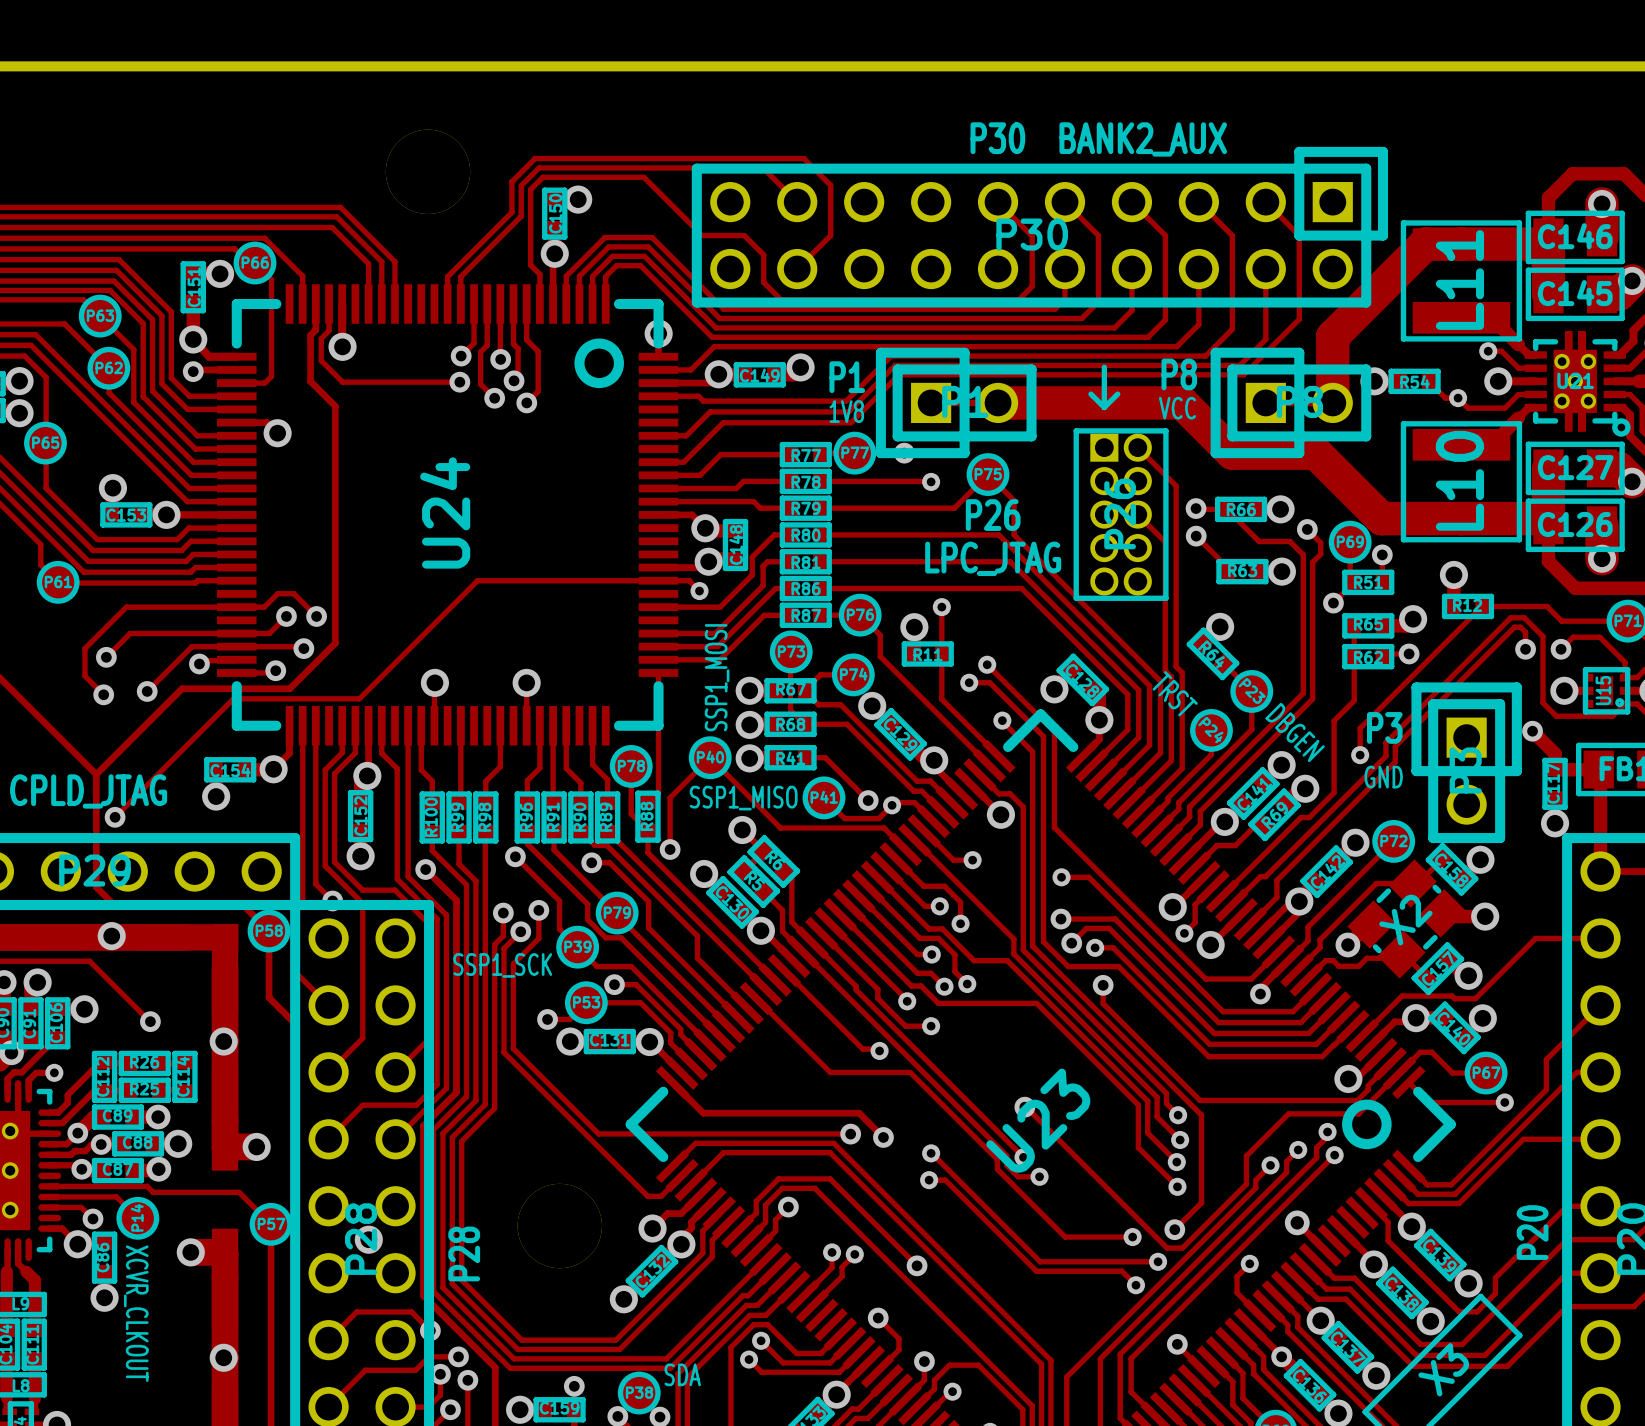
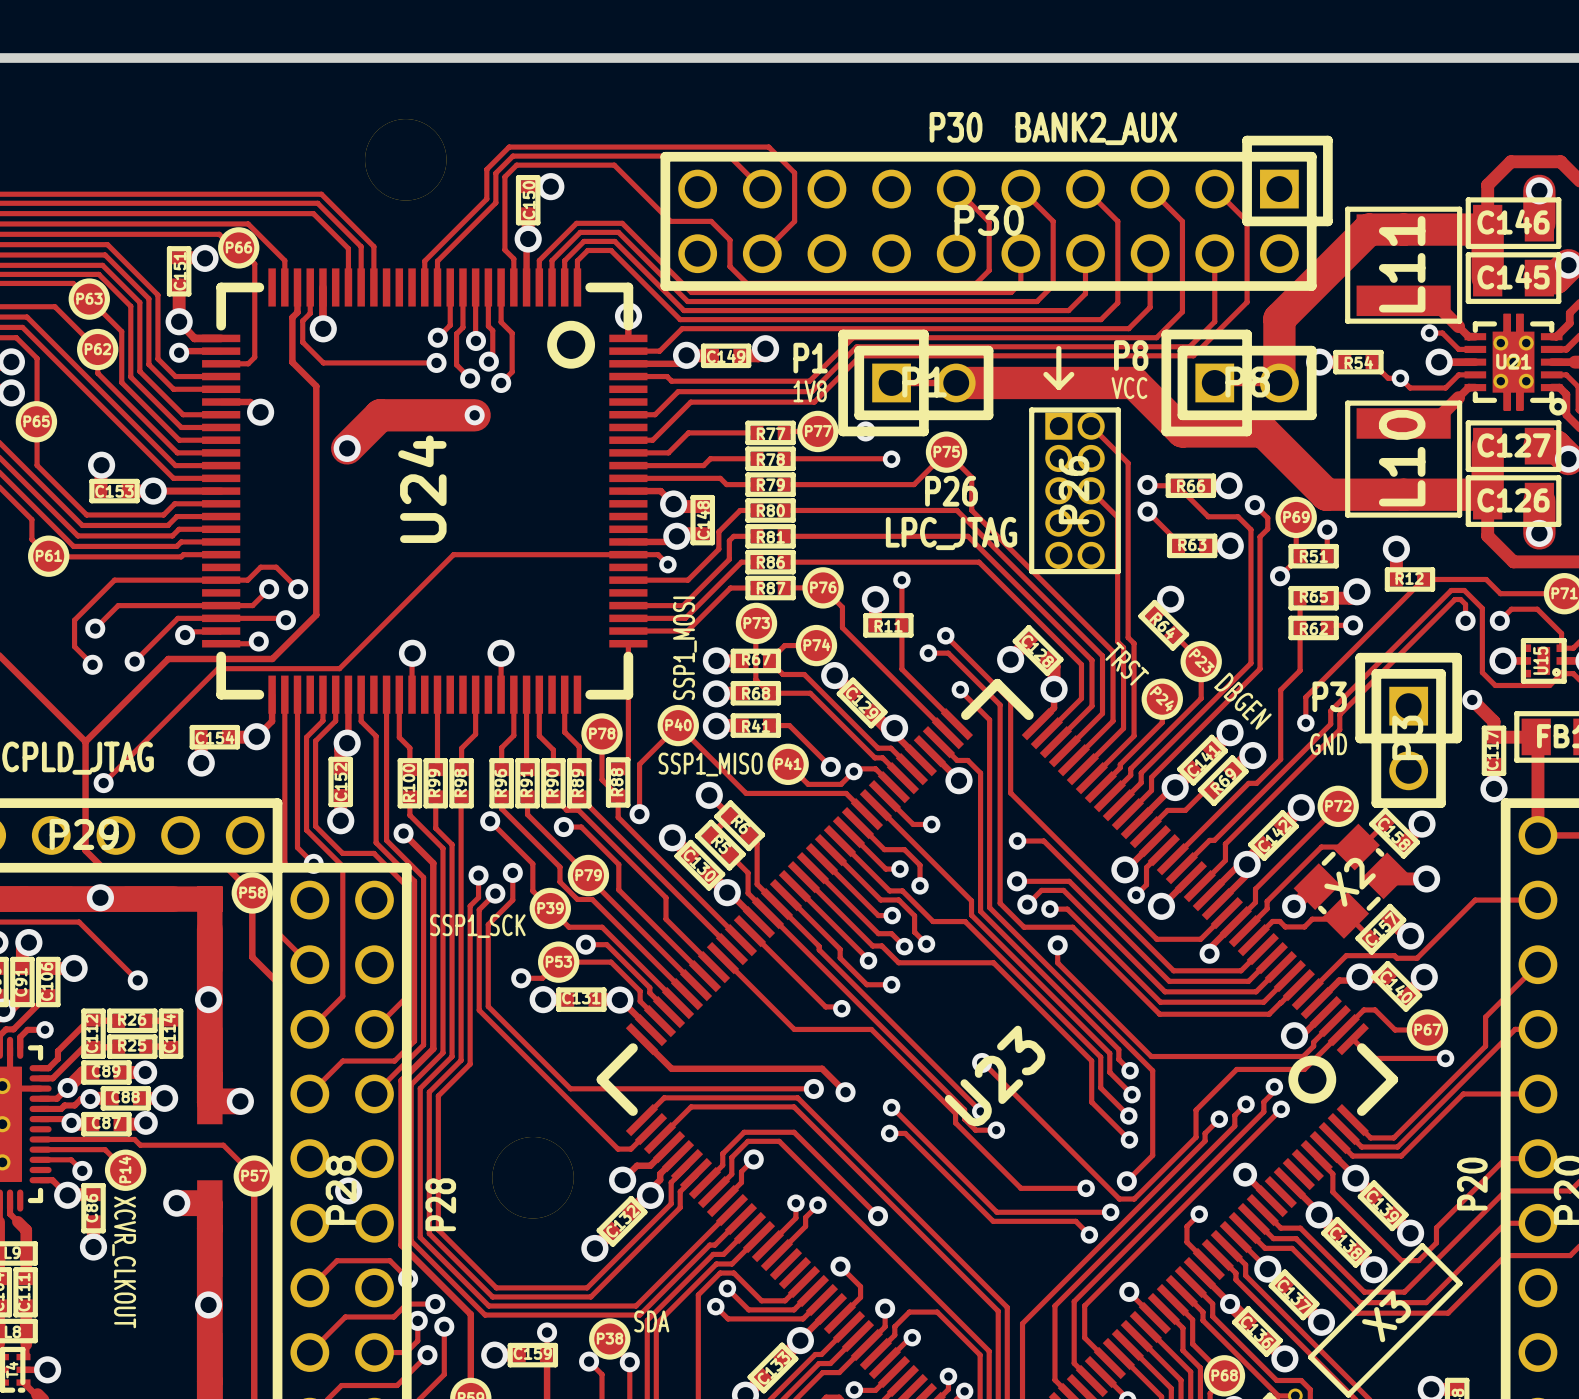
track: none -> (474, 415) (380, 415) (347, 448)
via: none -> (474, 415)
via: none -> (347, 448)

